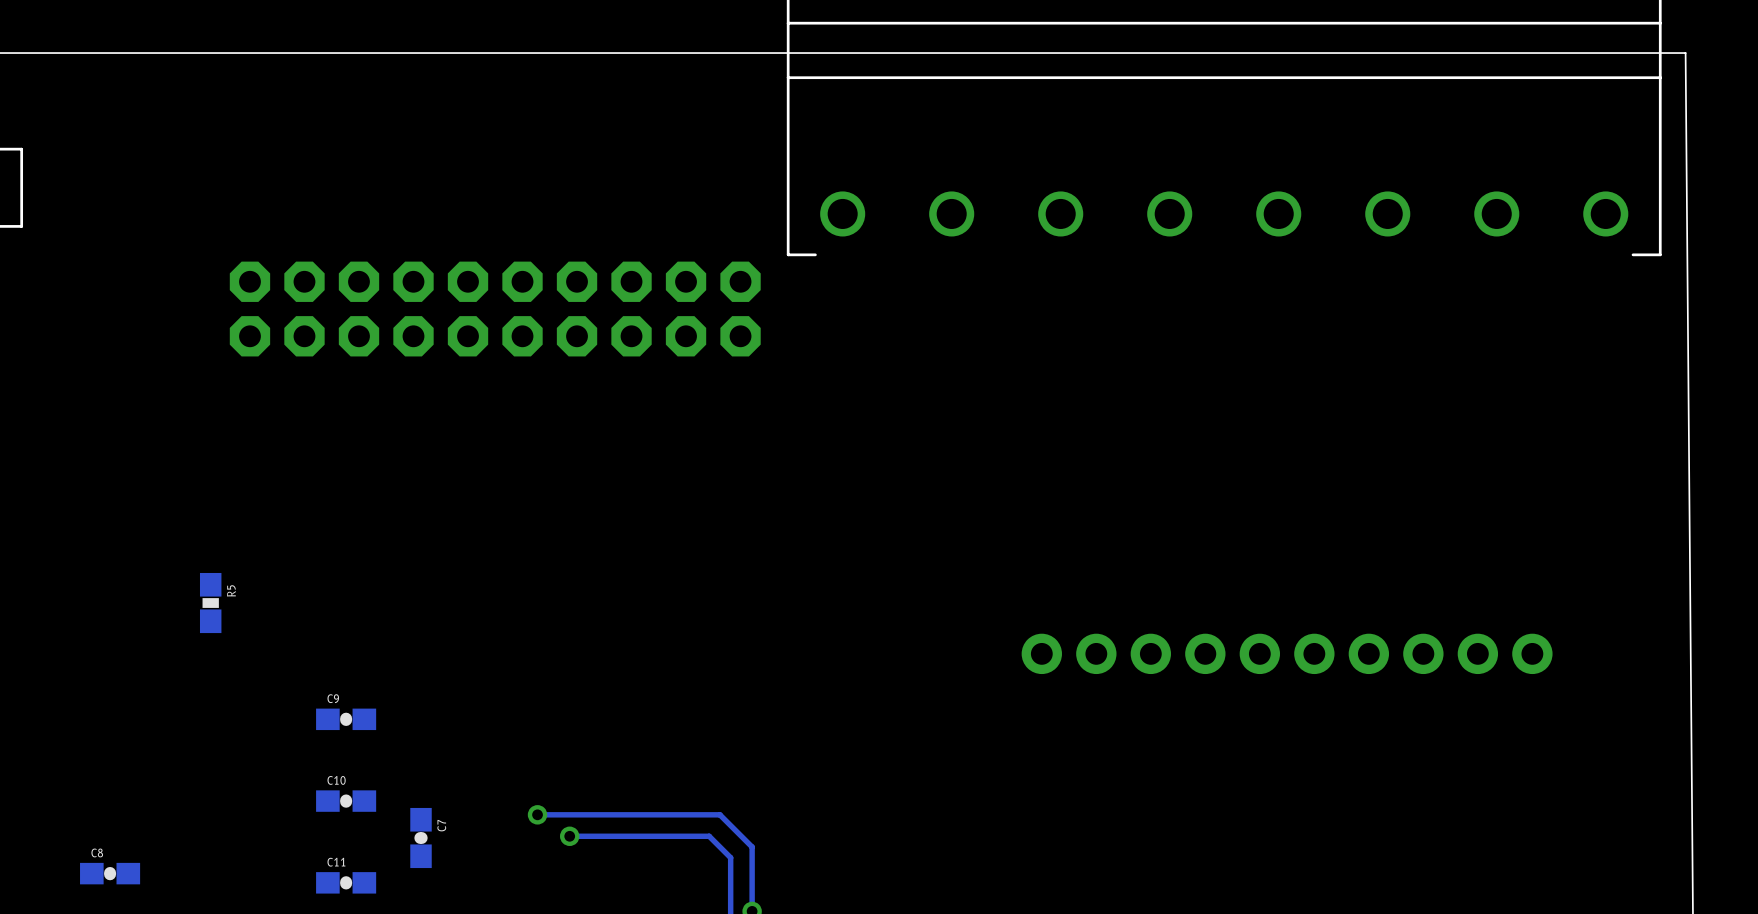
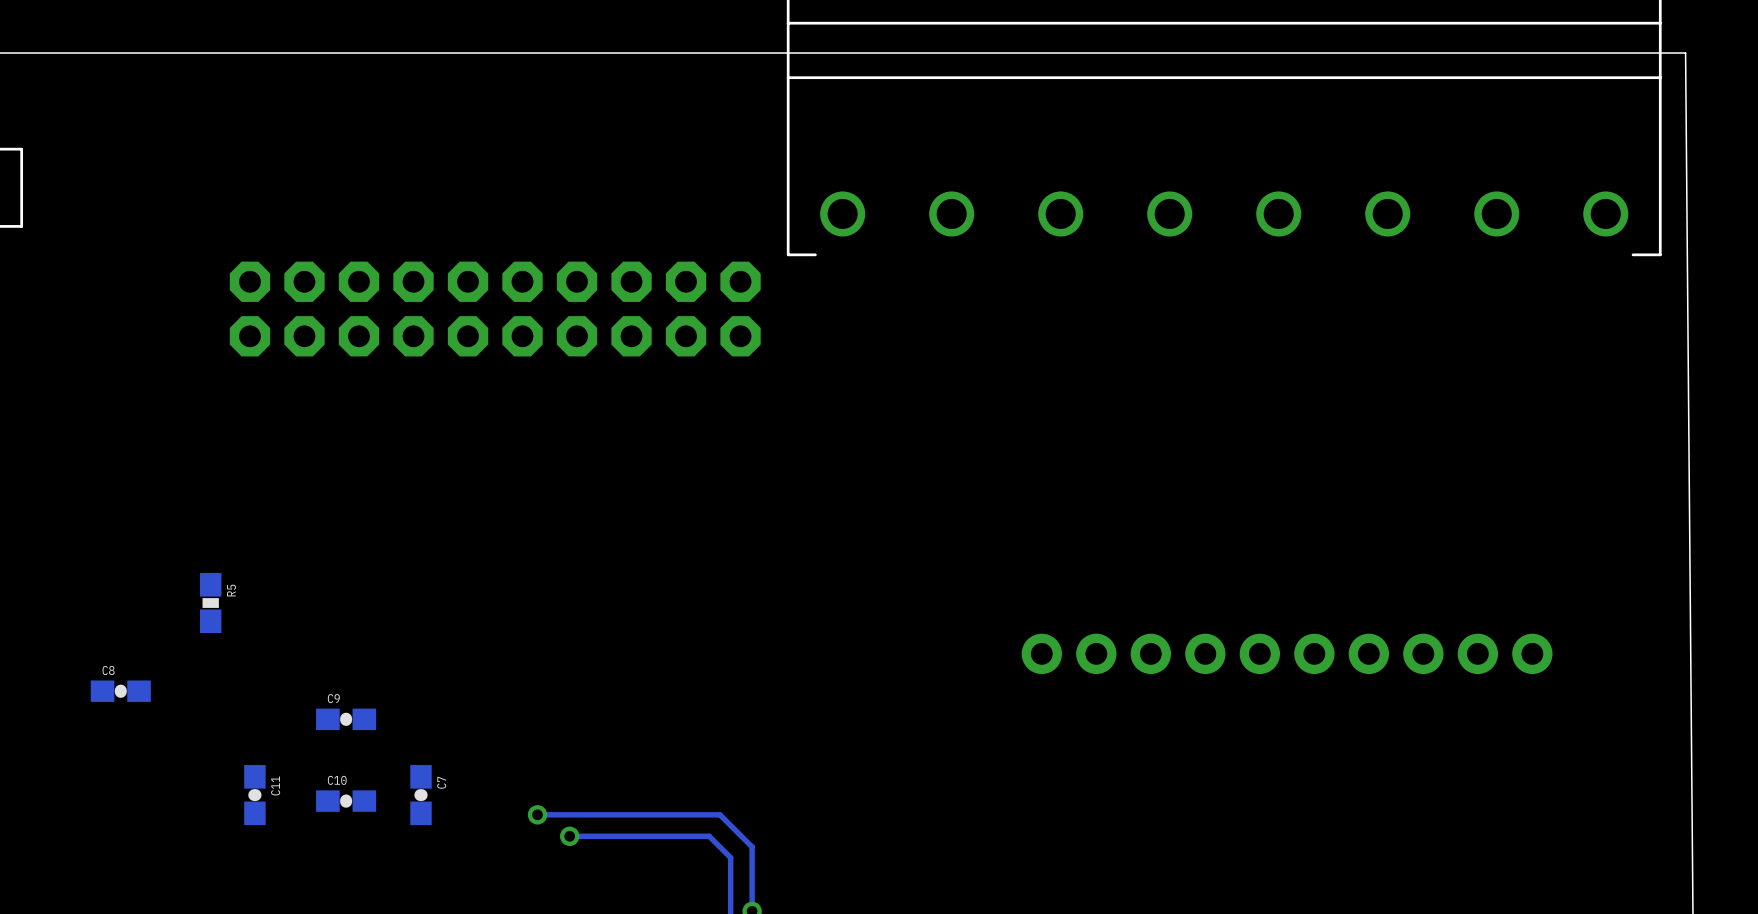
C7 position: (421, 837) -> (421, 795)
C8 position: (110, 873) -> (120, 691)
C11 rotation: 0° (346, 882) -> 90° clockwise (254, 795)
C11 position: (346, 882) -> (254, 795)

